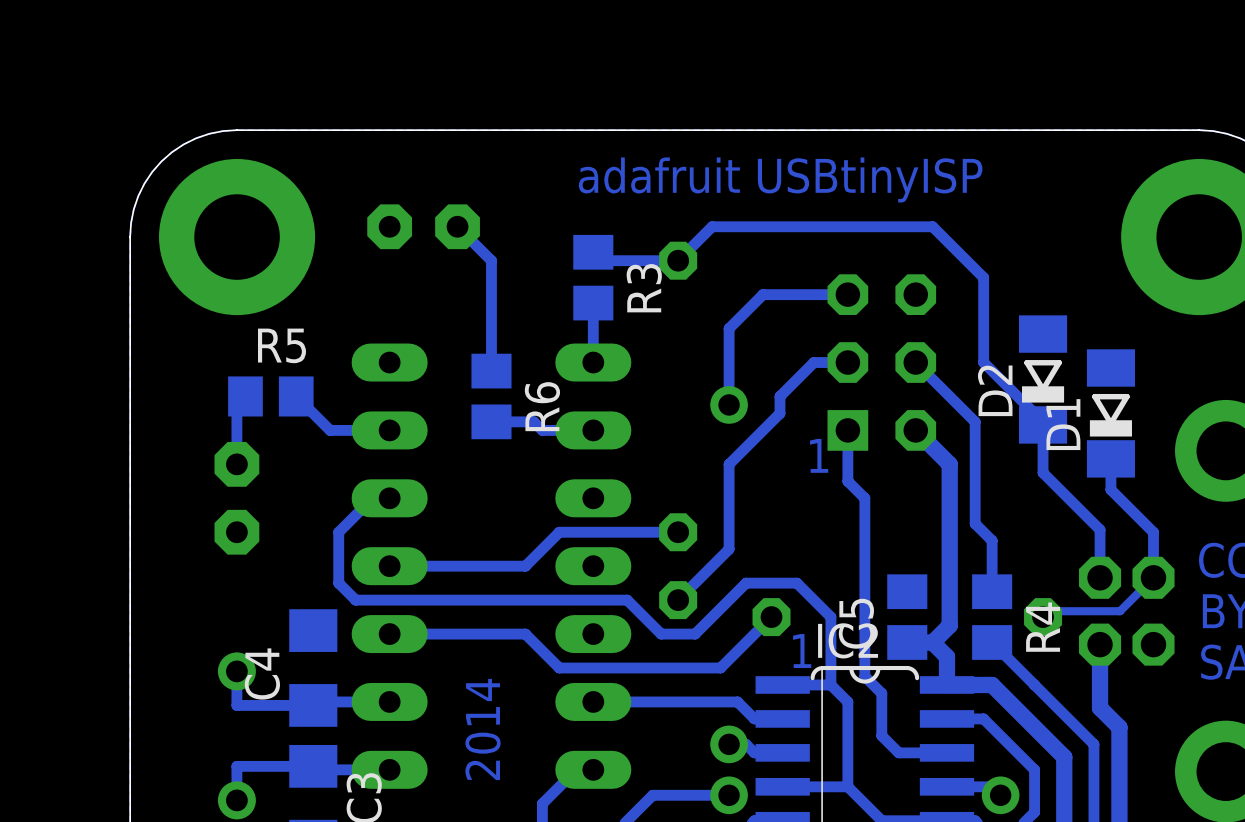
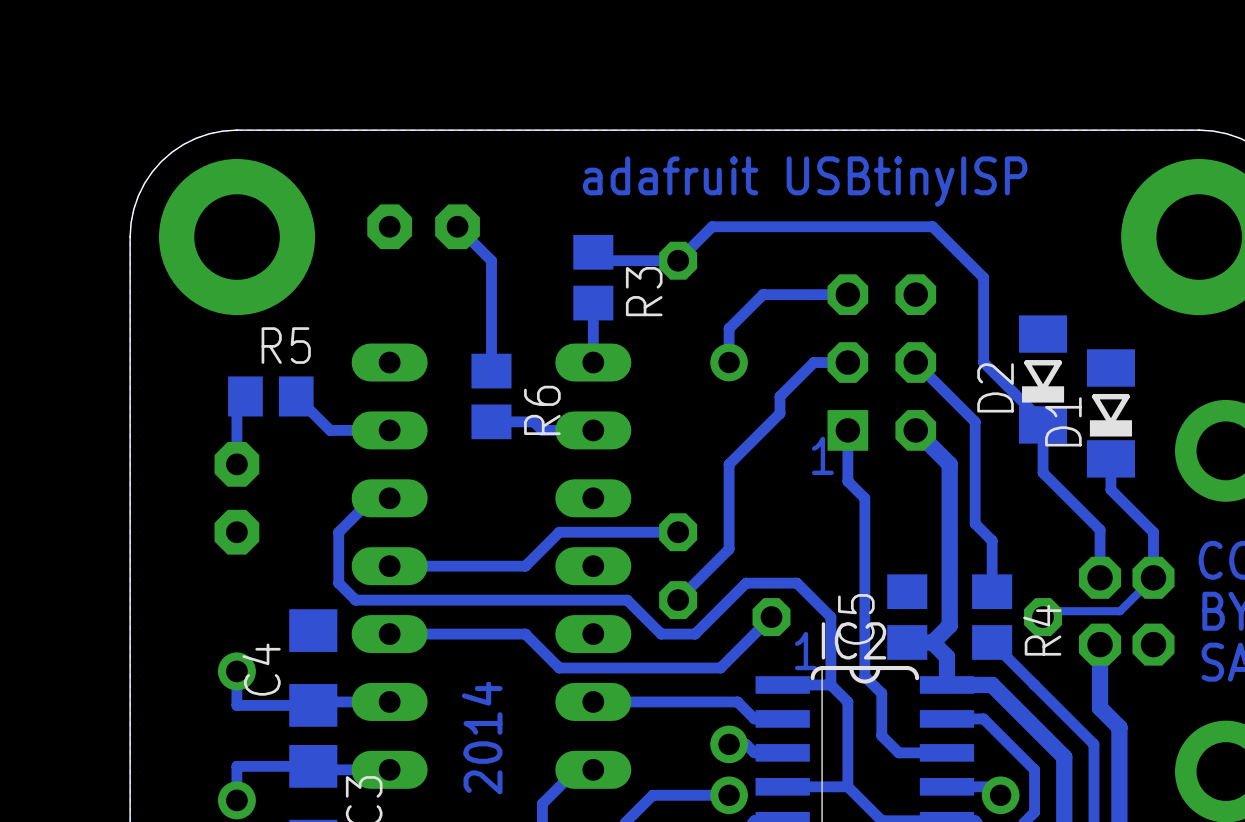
track: (729, 362) (729, 404) -> none
via position: (729, 404) -> (729, 362)

